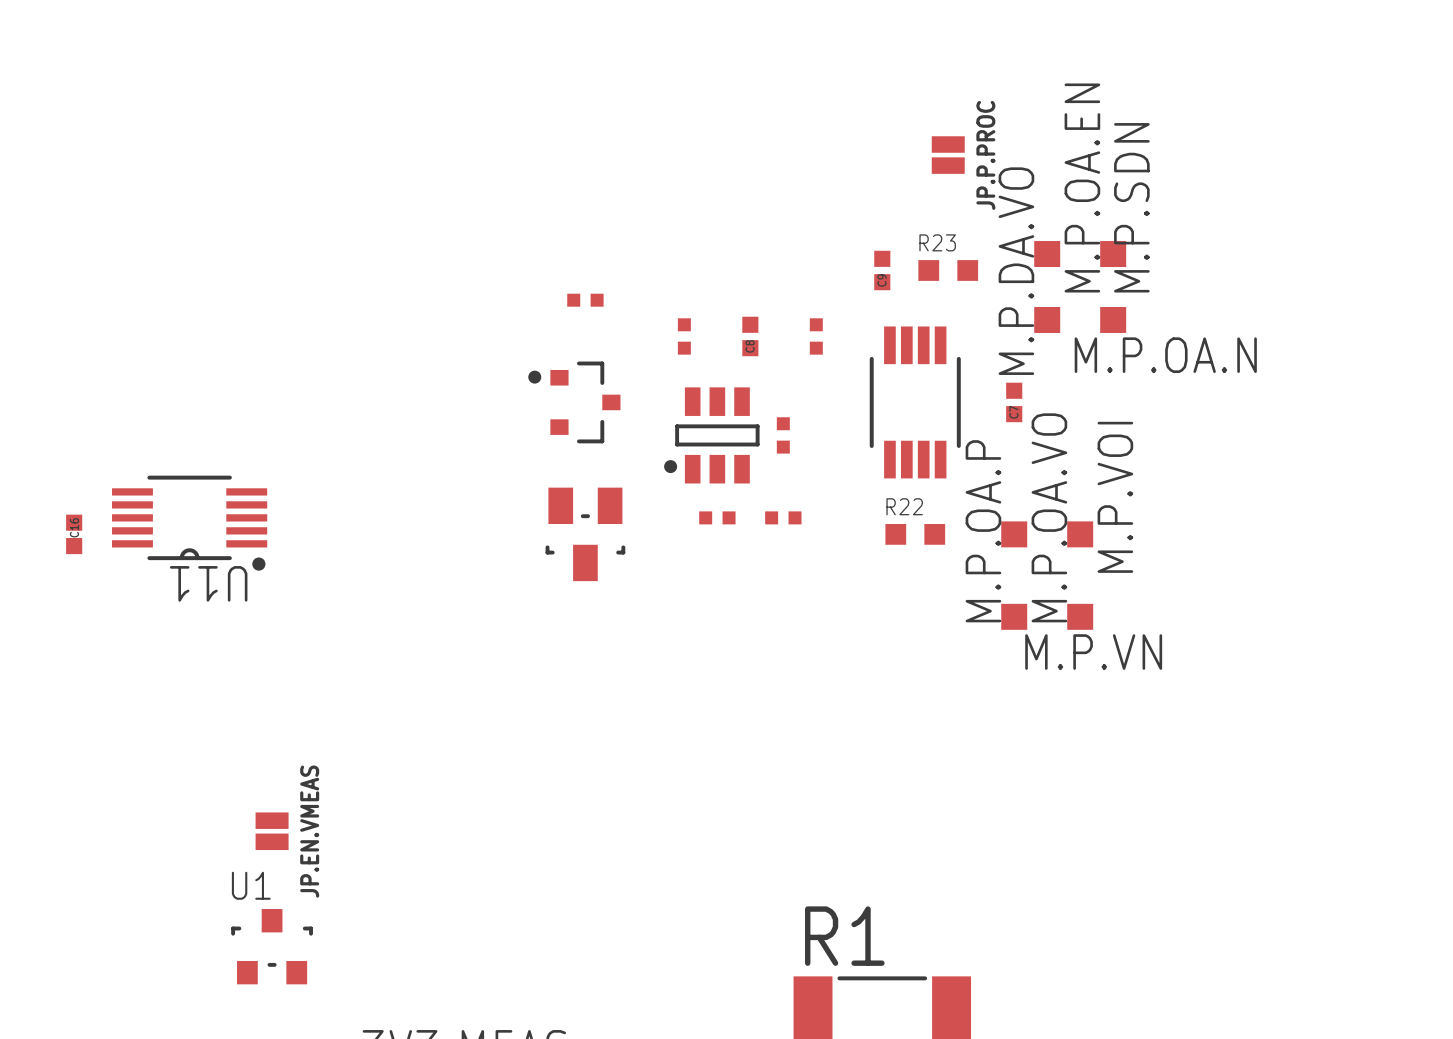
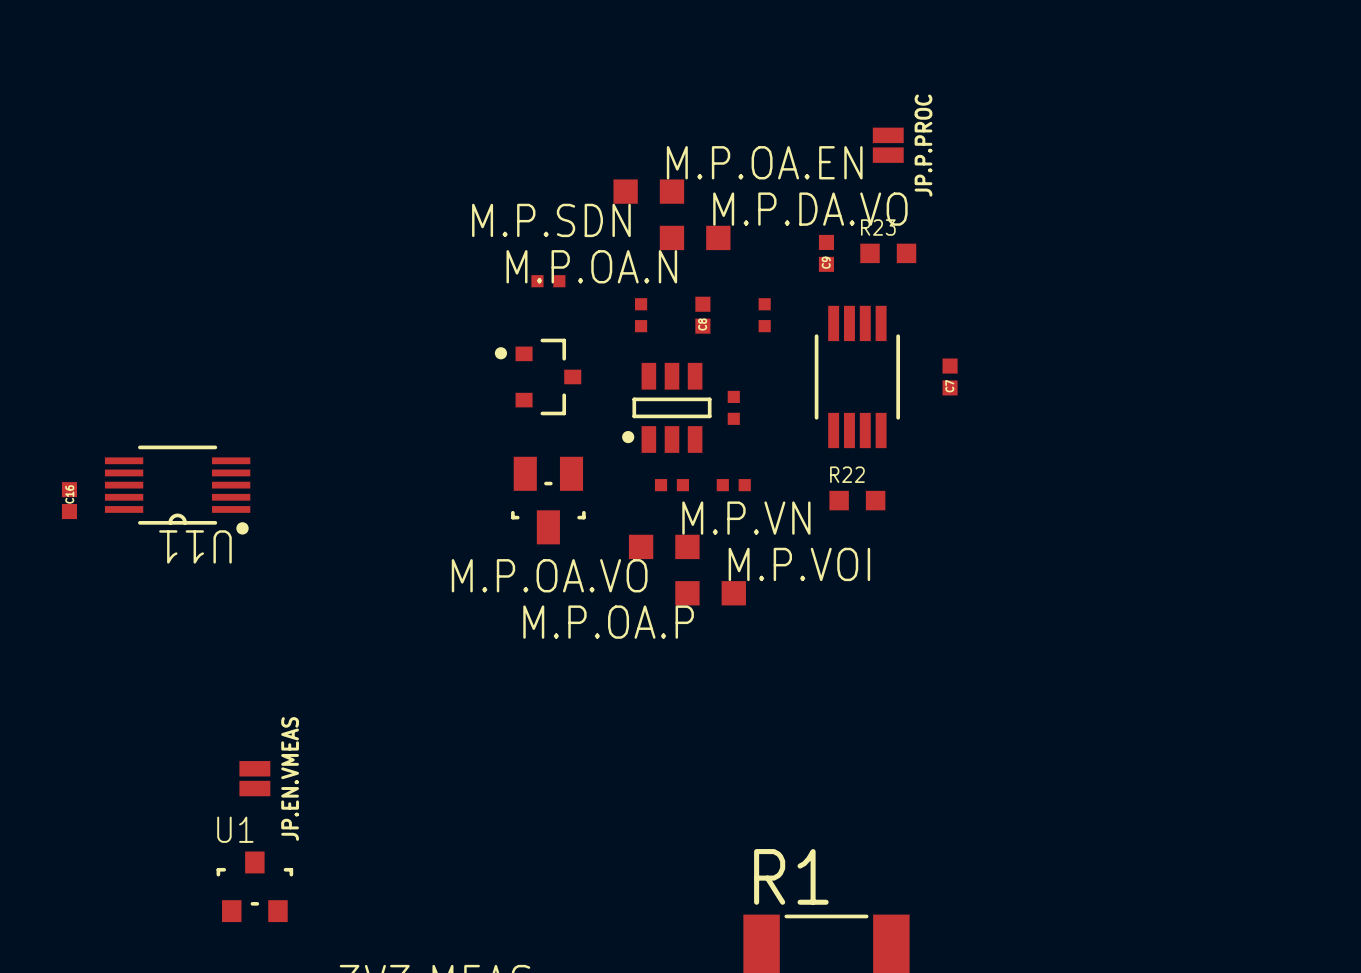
M.P.OA.EN name rotation: 0° (1082, 187) -> 90° clockwise (764, 162)
M.P.SDN name rotation: 0° (1131, 207) -> 90° clockwise (551, 220)
M.P.OA.EN position: (1047, 254) -> (671, 191)
M.P.SDN position: (1113, 254) -> (625, 191)
M.P.DA.VO name rotation: 0° (1016, 271) -> 90° clockwise (810, 209)
M.P.DA.VO position: (1047, 319) -> (718, 237)
M.P.OA.N position: (1113, 319) -> (671, 237)
M.P.OA.N name position: M.P.OA.N (1165, 355) -> M.P.OA.N (591, 266)
M.P.VOI name rotation: 0° (1115, 497) -> 90° clockwise (799, 564)
M.P.OA.VO name rotation: 0° (1049, 517) -> 90° clockwise (549, 575)
M.P.OA.P name rotation: 0° (983, 531) -> 90° clockwise (608, 622)
M.P.OA.VO position: (1014, 534) -> (641, 546)
M.P.VOI position: (1080, 534) -> (733, 593)
M.P.OA.P position: (1014, 616) -> (687, 593)
M.P.VN position: (1080, 616) -> (687, 546)
M.P.VN name position: M.P.VN (1093, 652) -> M.P.VN (746, 518)

